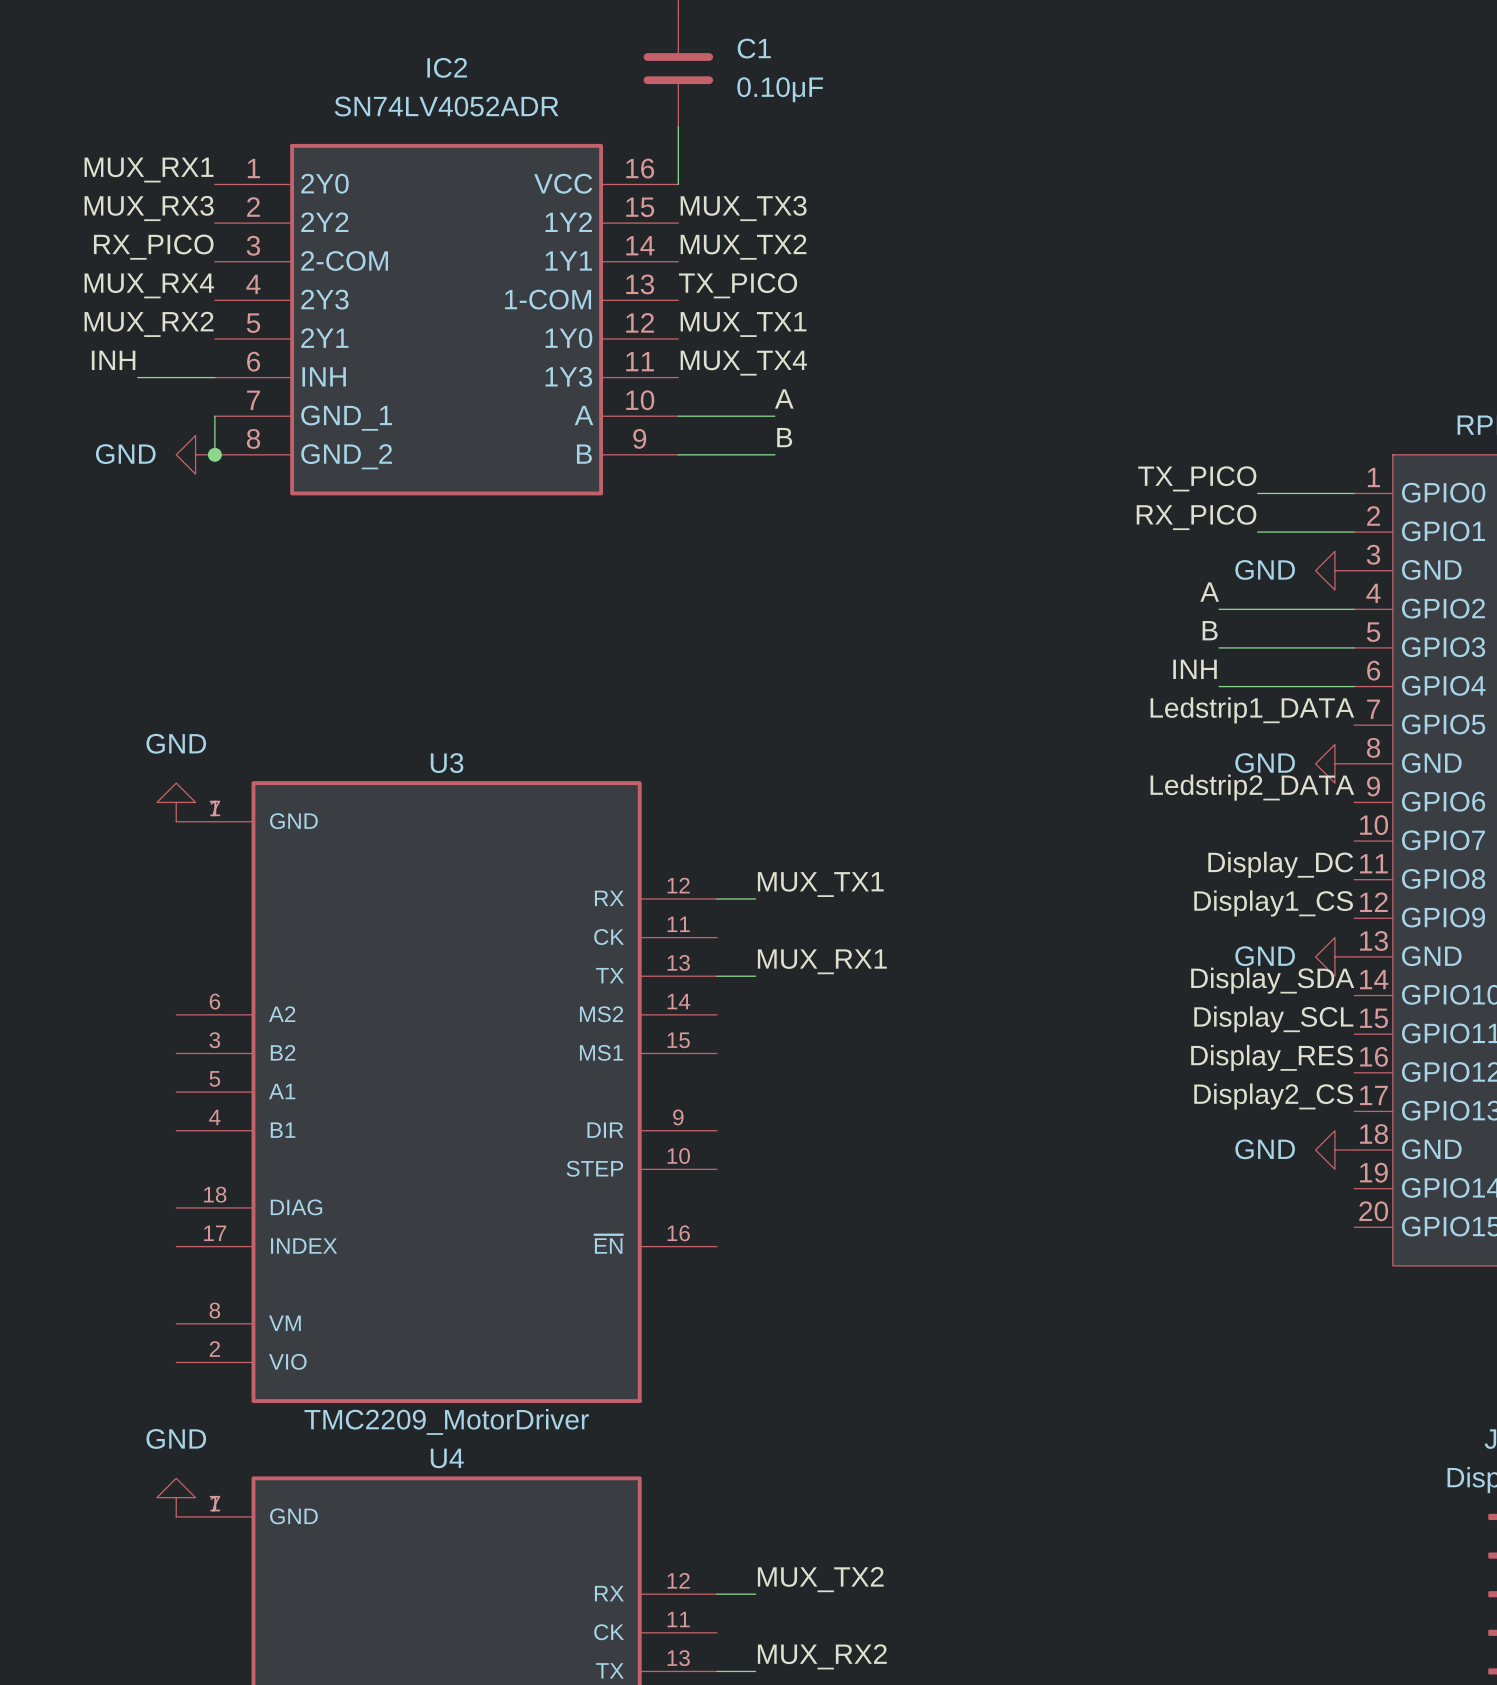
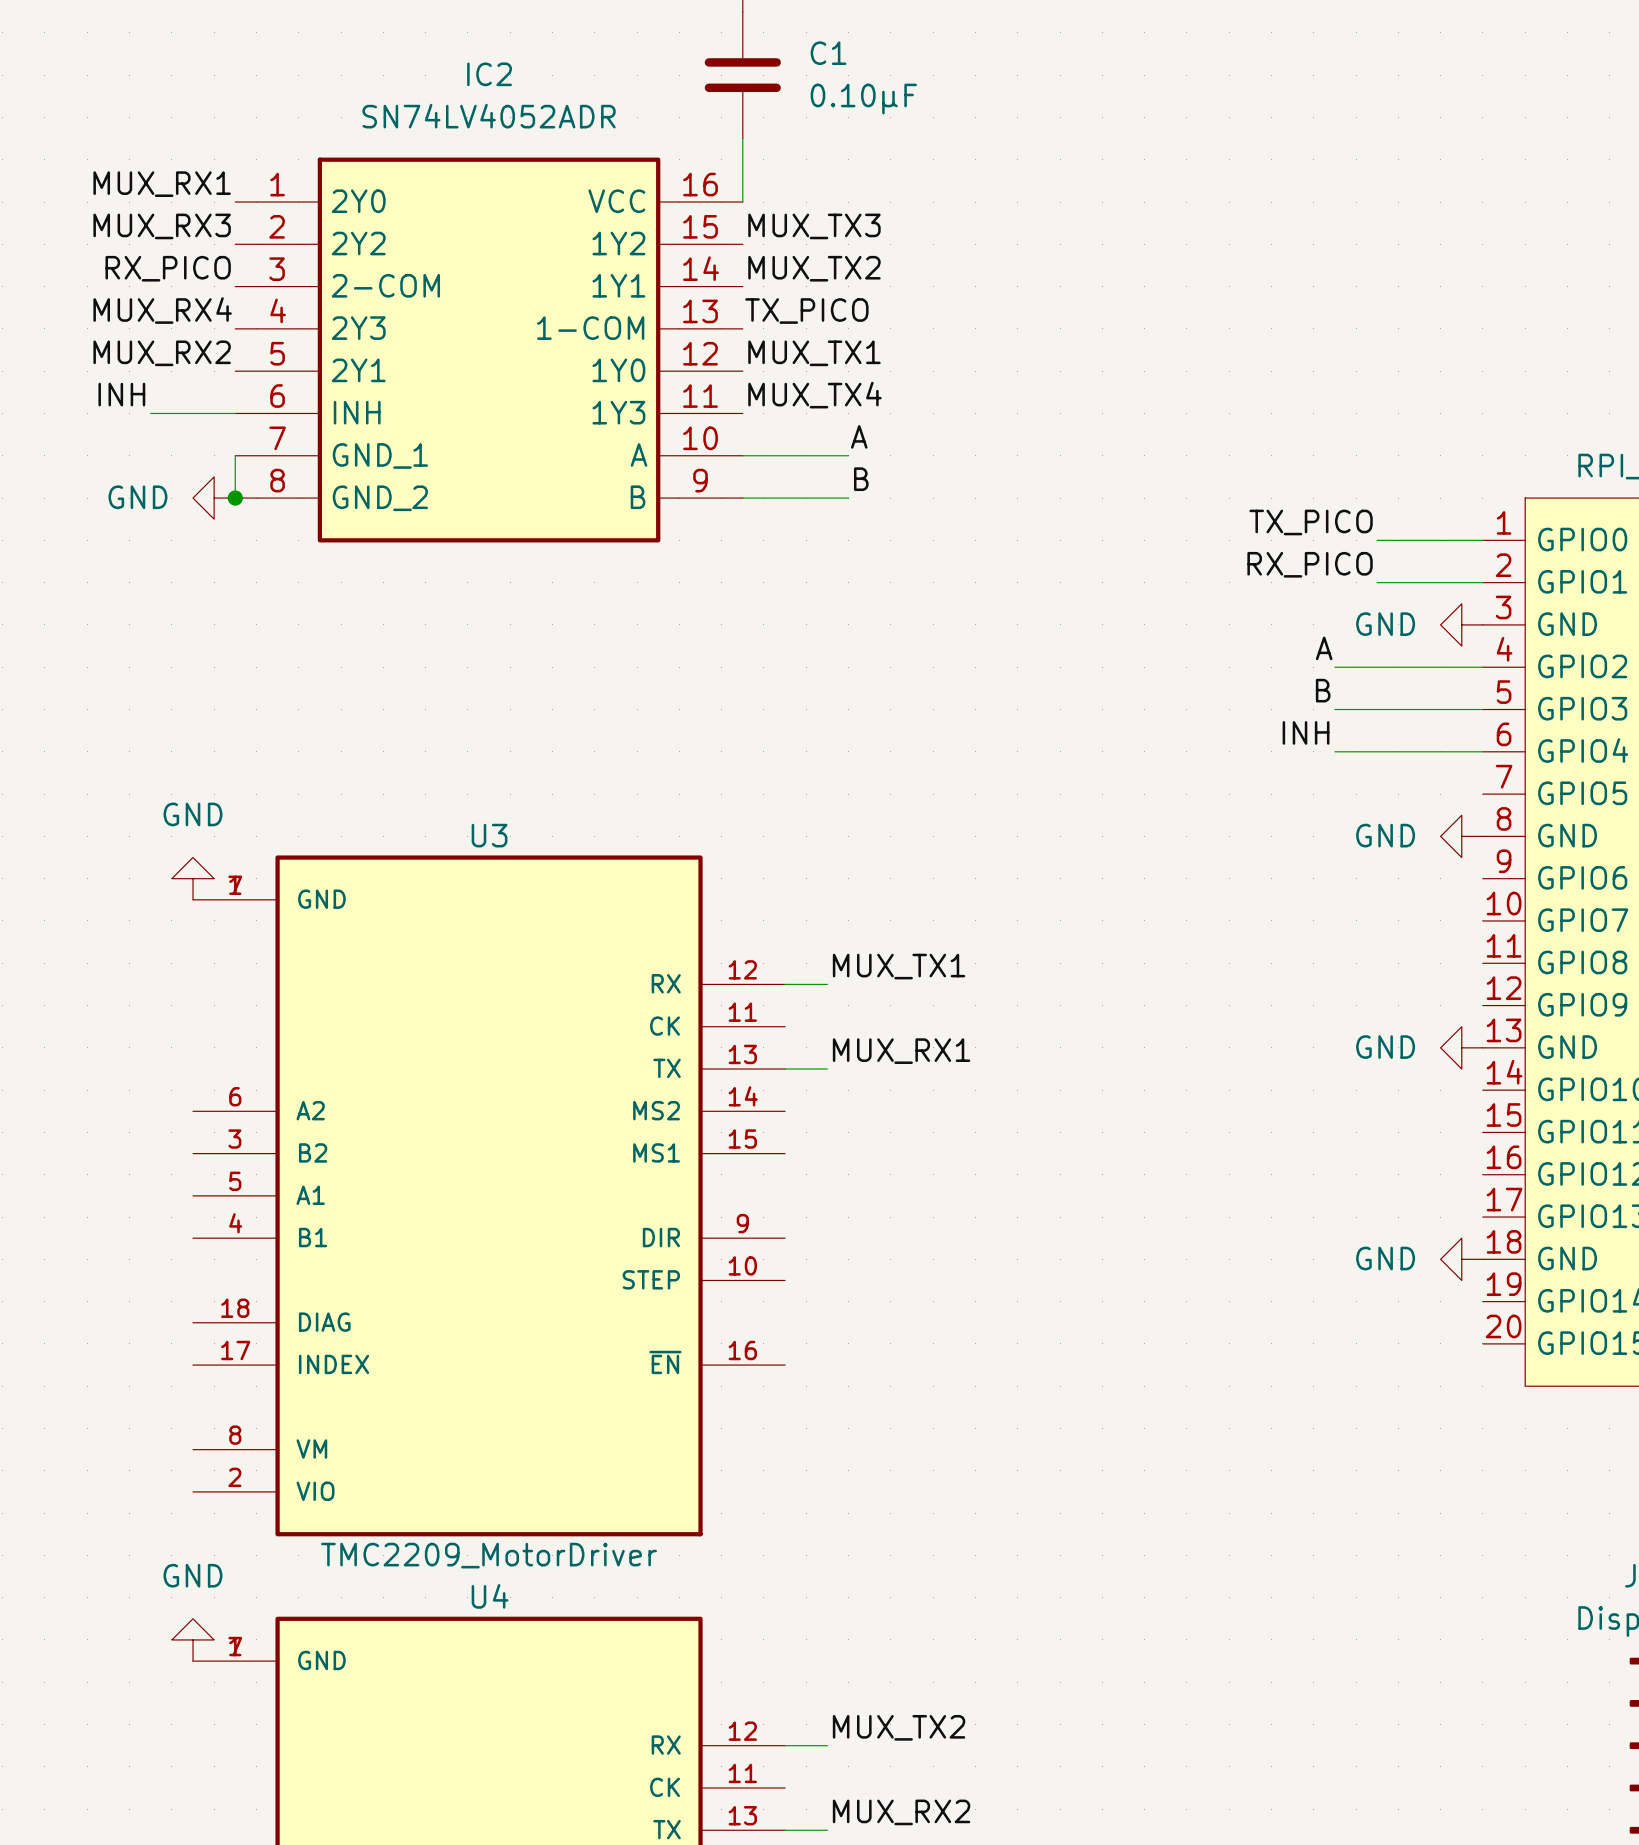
label: Ledstrip1_DATA (1252, 710) -> none
label: Ledstrip2_DATA (1252, 787) -> none
label: Display_DC (1280, 864) -> none
label: Display1_CS (1273, 903) -> none
label: Display_SDA (1272, 980) -> none
label: Display_SCL (1273, 1019) -> none
label: Display_RES (1272, 1057) -> none
label: Display2_CS (1273, 1096) -> none

